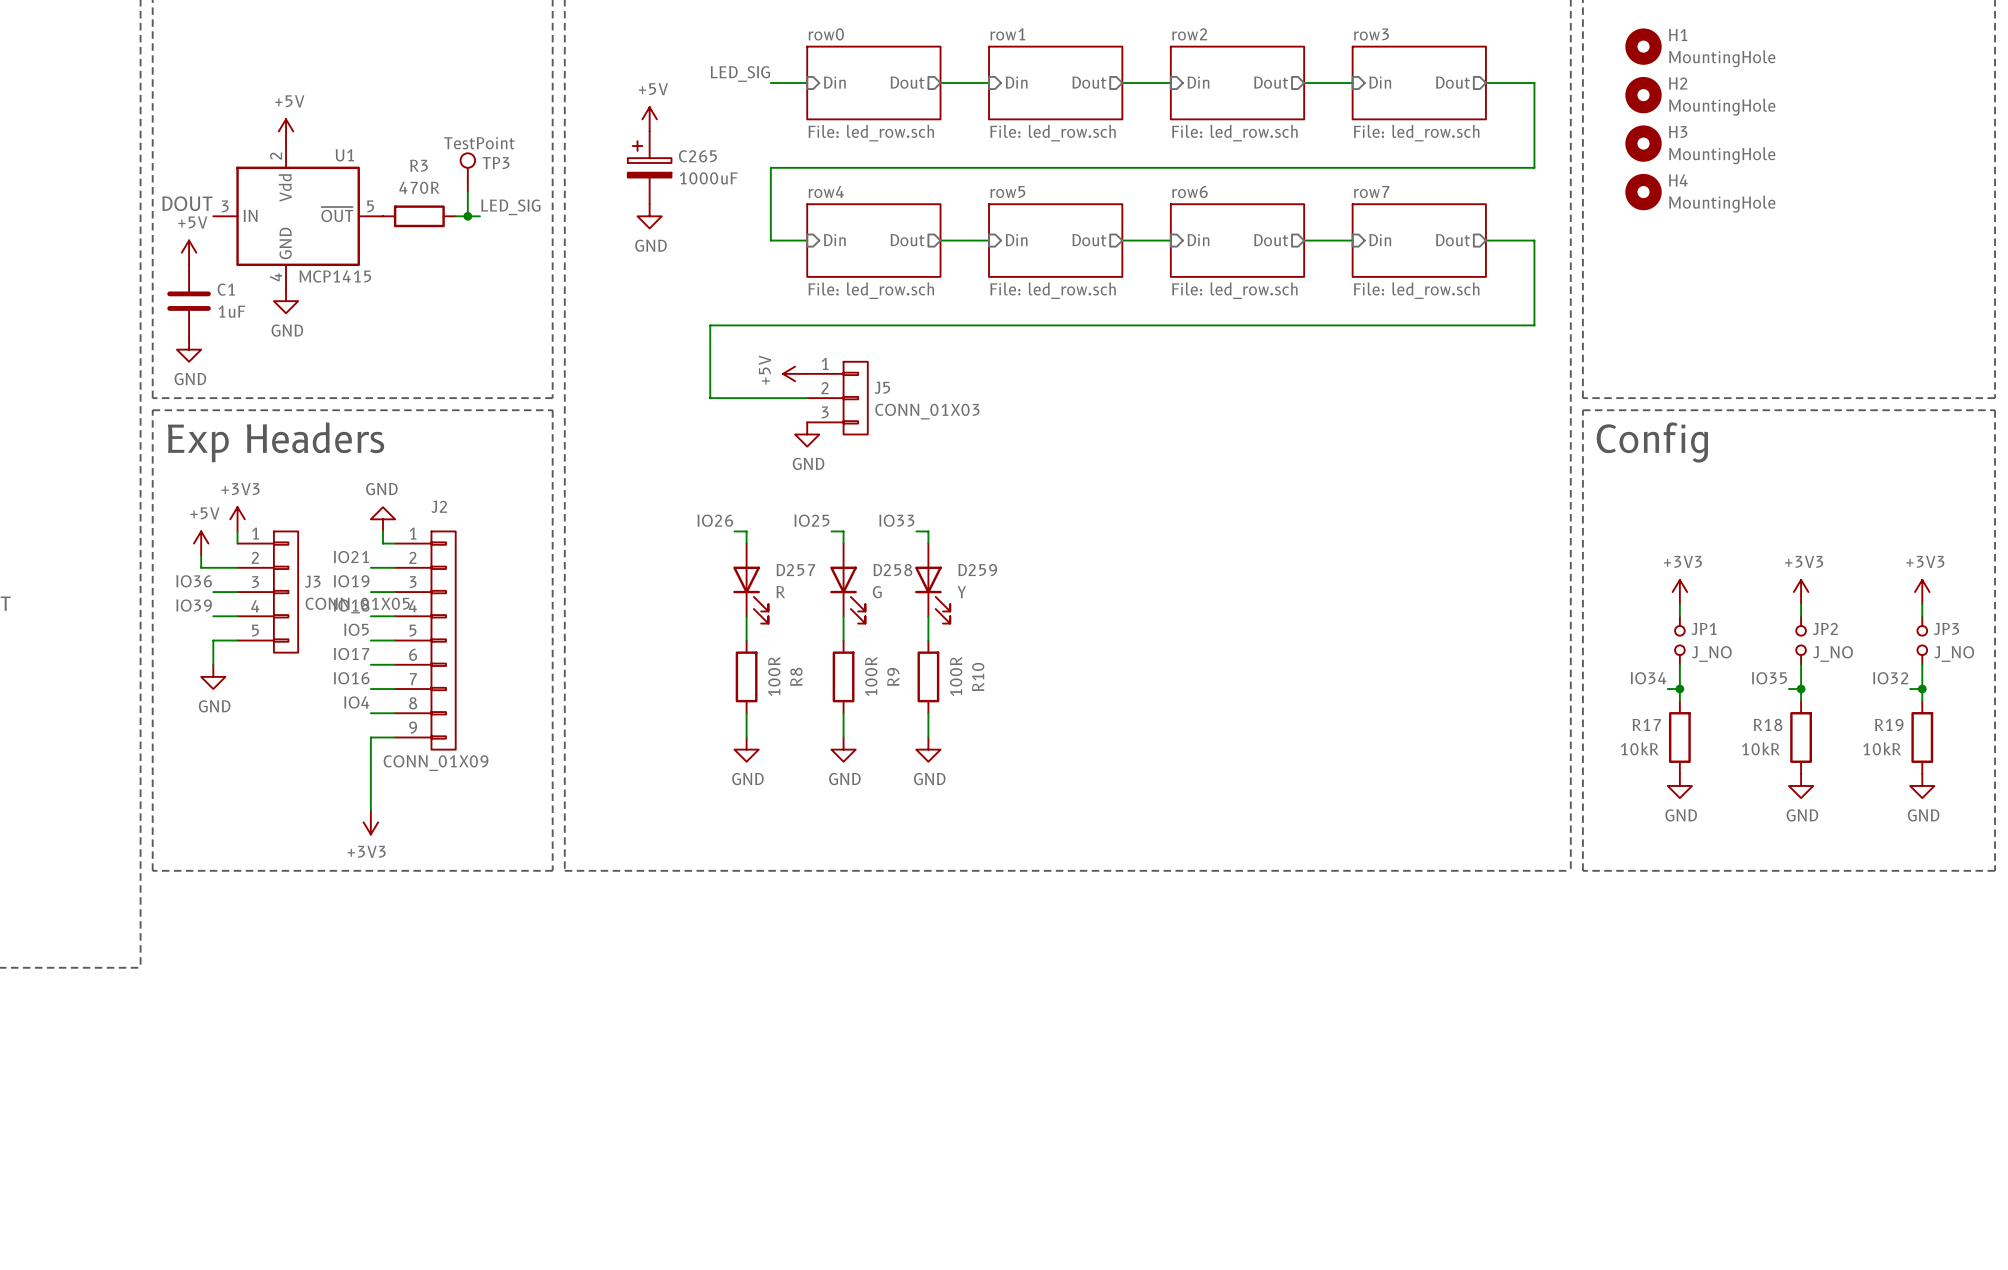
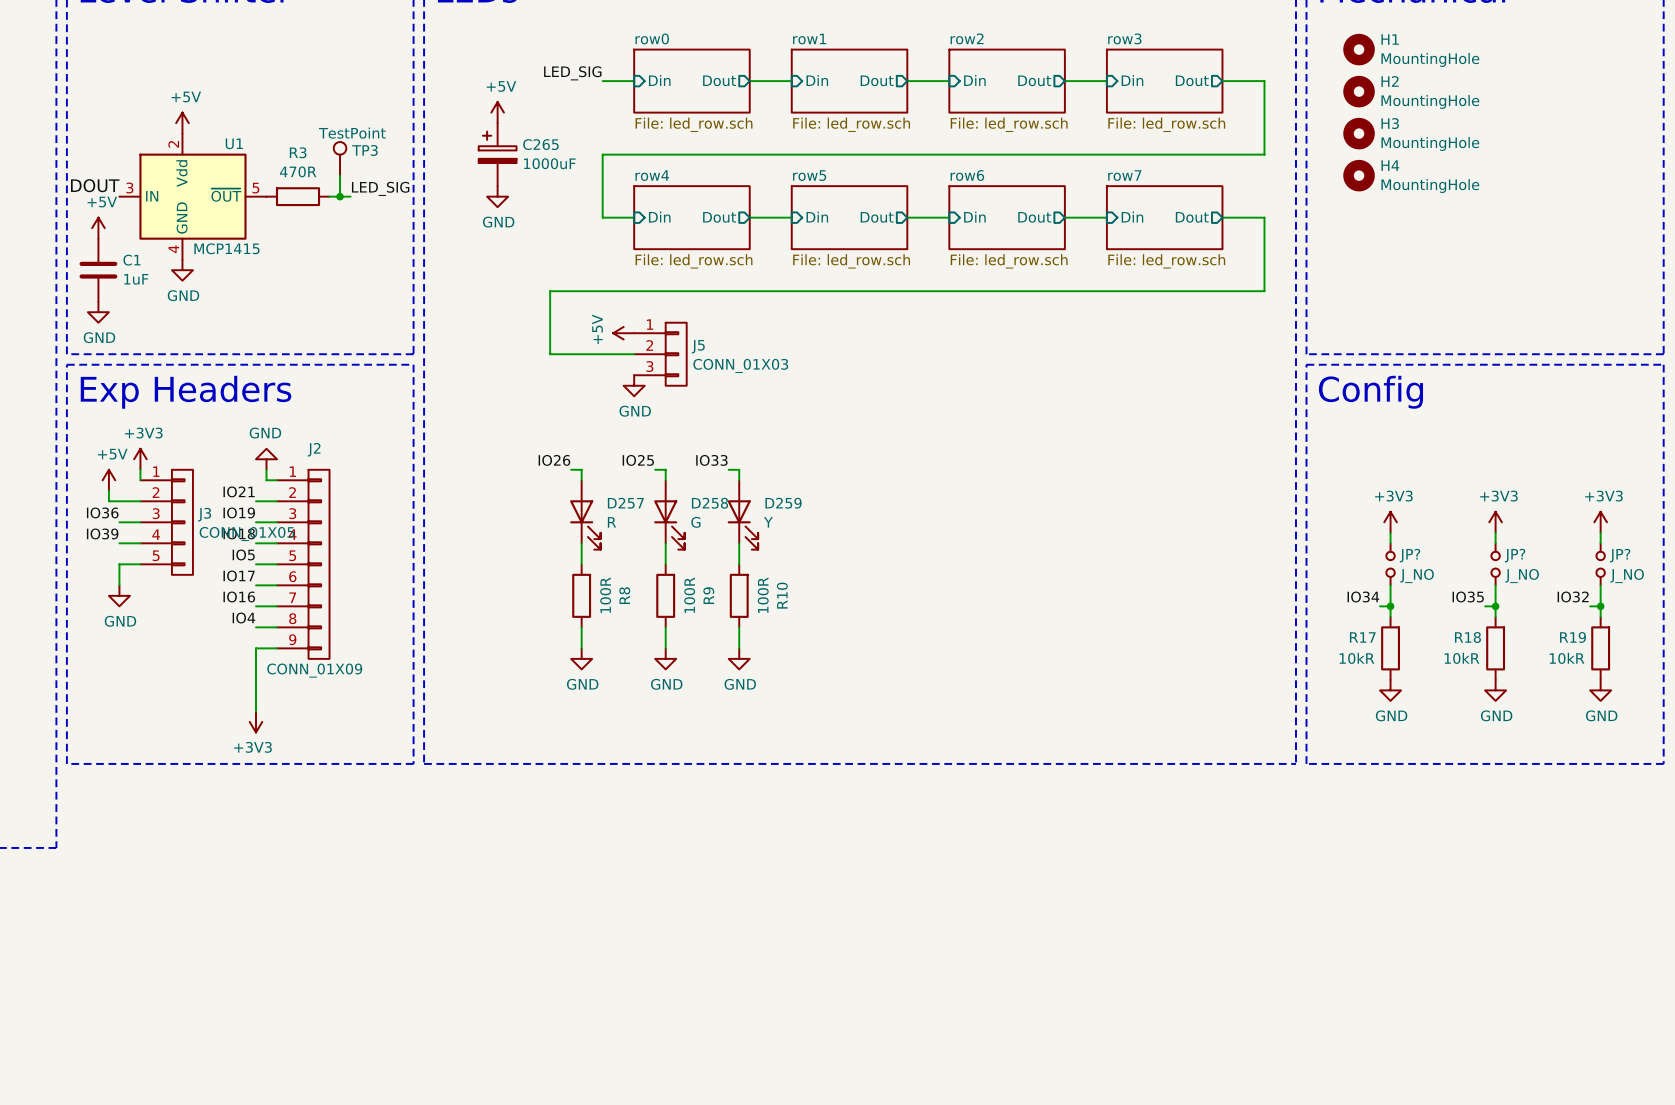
JP1 name: JP1 (1704, 629) -> JP? (1410, 555)
JP2 name: JP2 (1825, 629) -> JP? (1515, 555)
JP3 name: JP3 (1946, 629) -> JP? (1620, 555)

